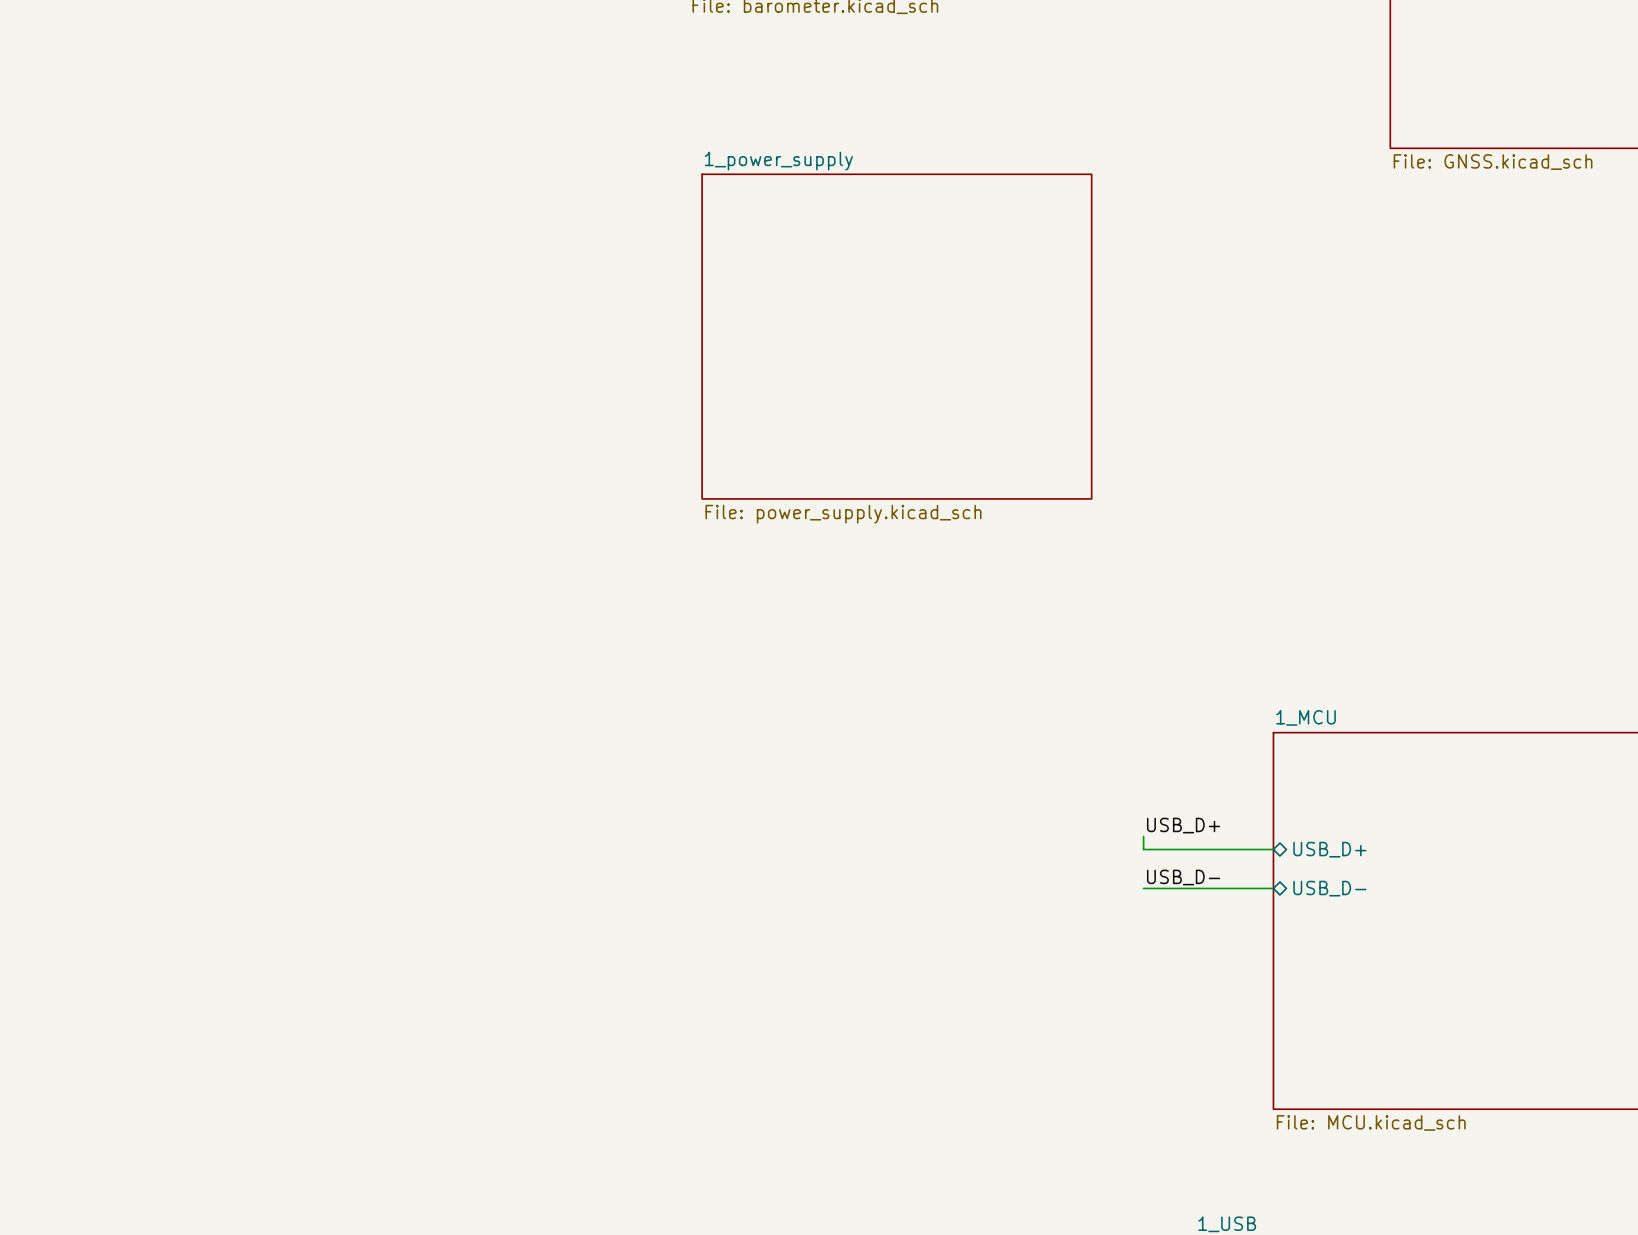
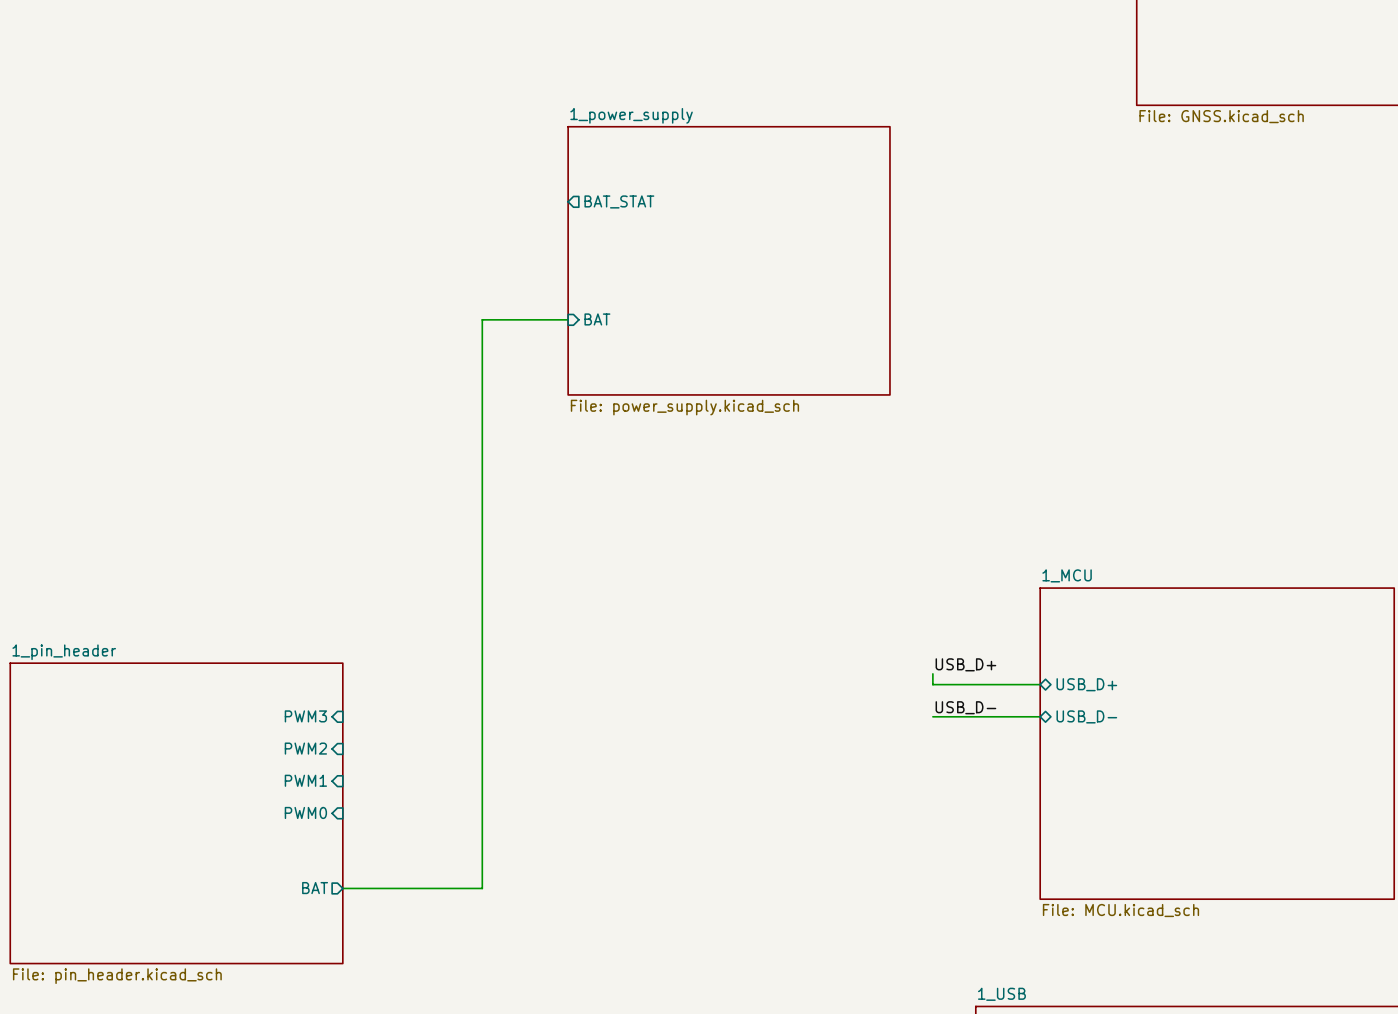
sheet pin: none -> BAT_STAT (619, 201)
sheet pin: none -> BAT (597, 319)
wire: none -> (568, 319) (482, 319) (482, 888) (342, 888)
sheet pin: none -> PWM3 (305, 716)
sheet pin: none -> PWM2 (305, 748)
sheet pin: none -> PWM1 (305, 780)
sheet pin: none -> PWM0 (305, 812)
sheet 1_pin_header: none -> File: pin_header.kicad_sch (176, 813)
sheet pin: none -> BAT (315, 888)

